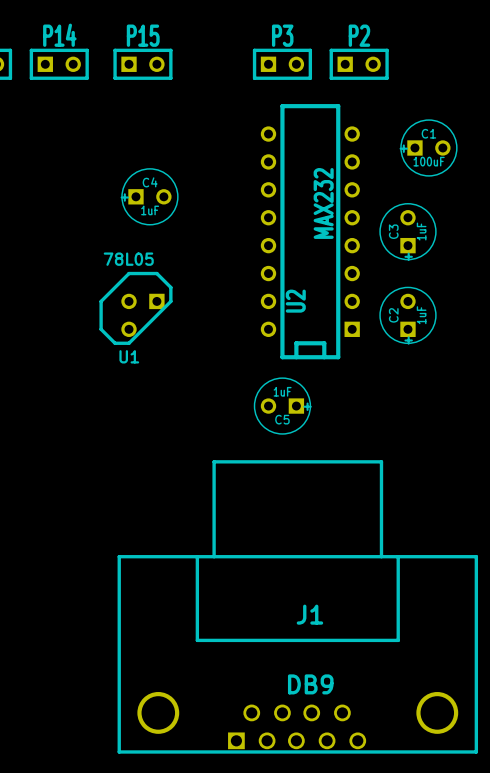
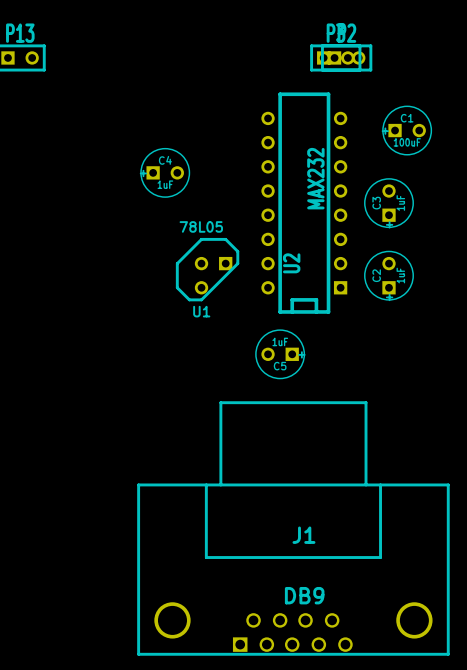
P14: (59, 64) -> none
P15: (142, 64) -> none
P3 position: (282, 64) -> (335, 57)
U1 position: (135, 308) -> (207, 269)

